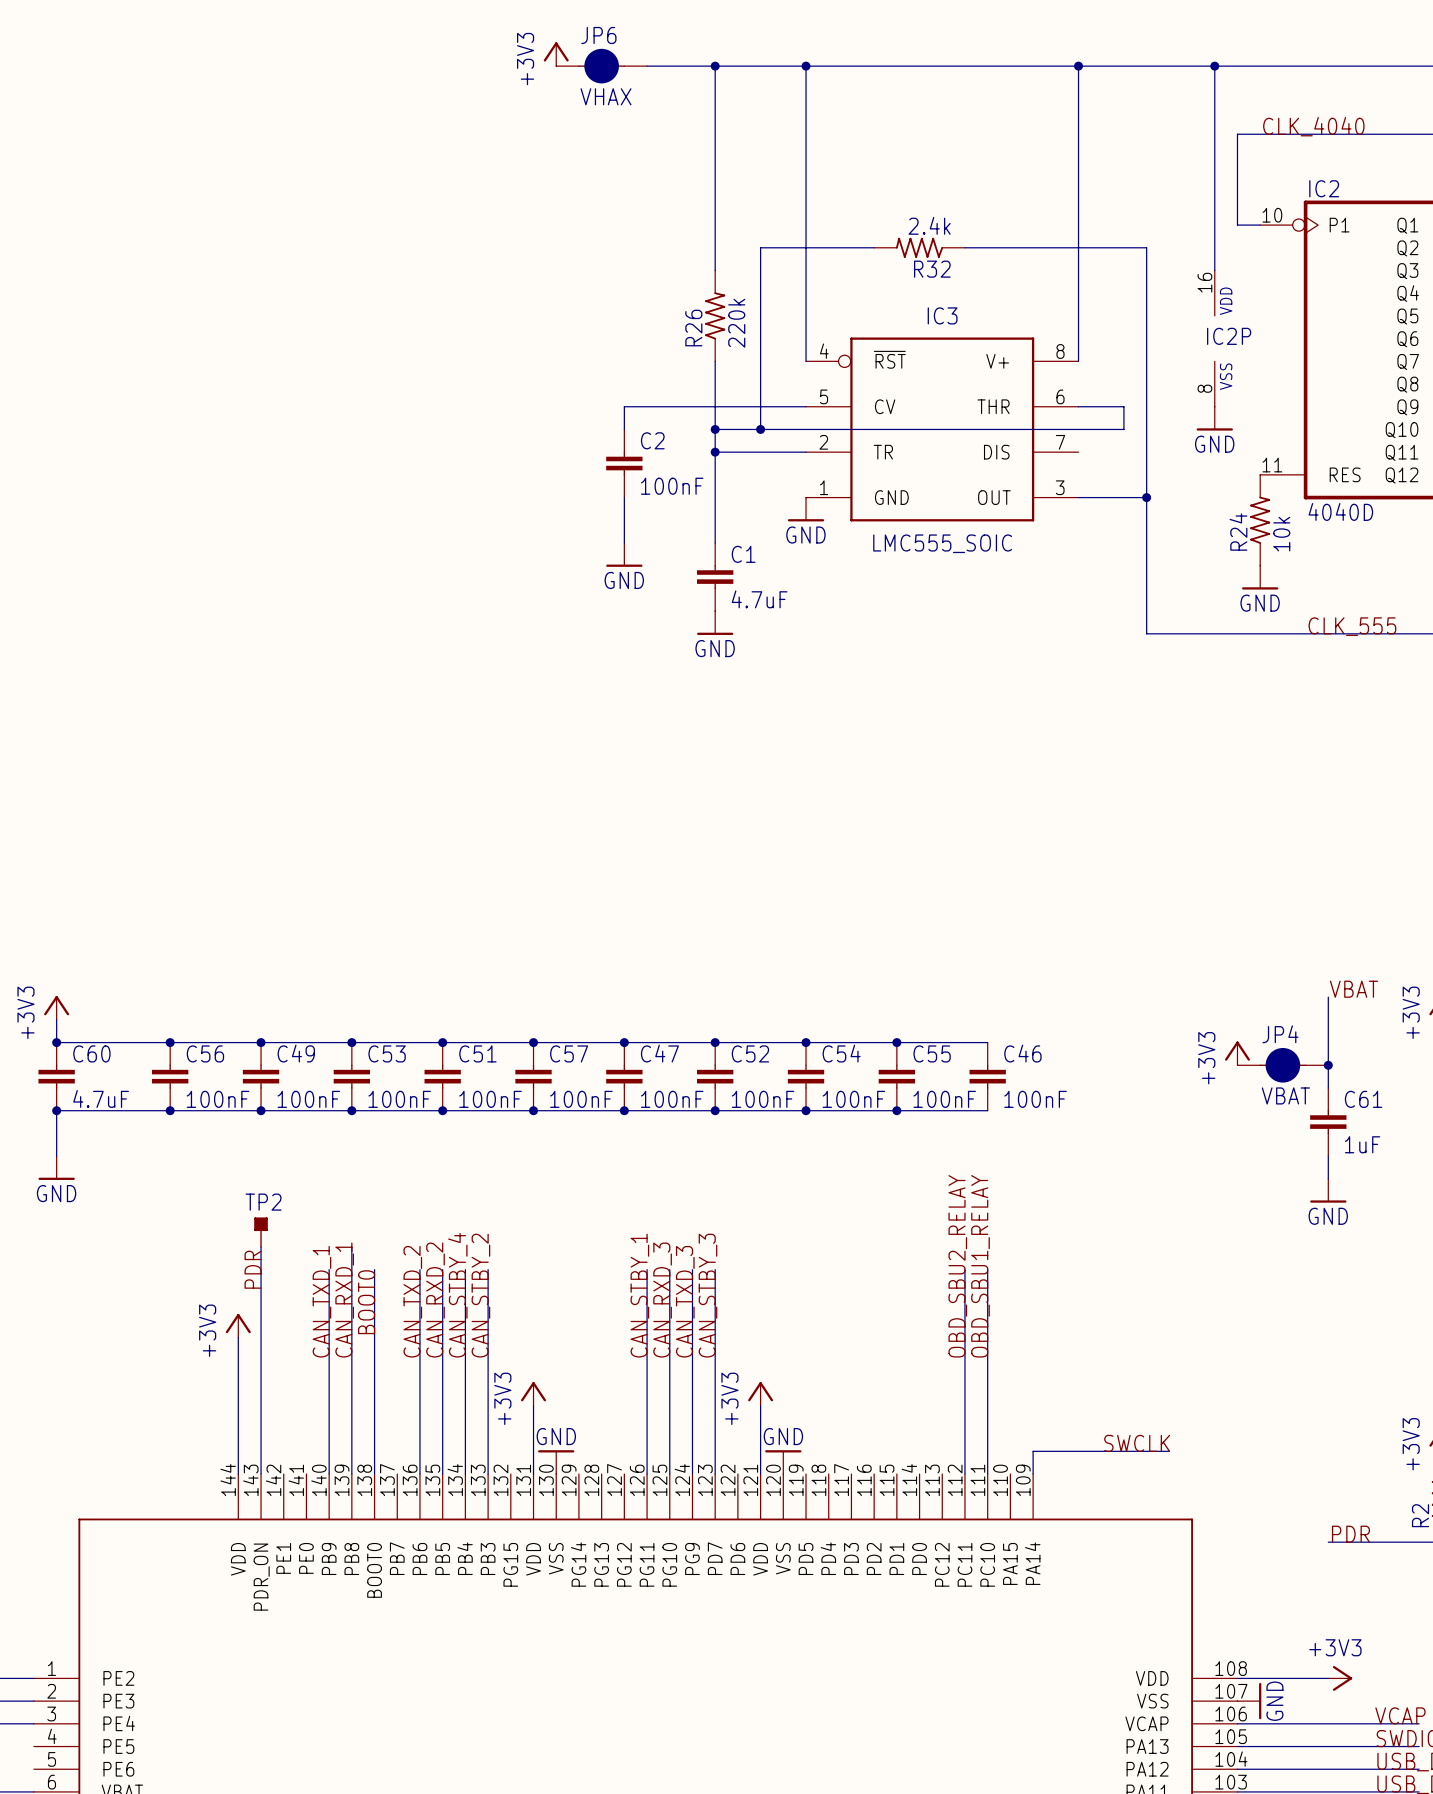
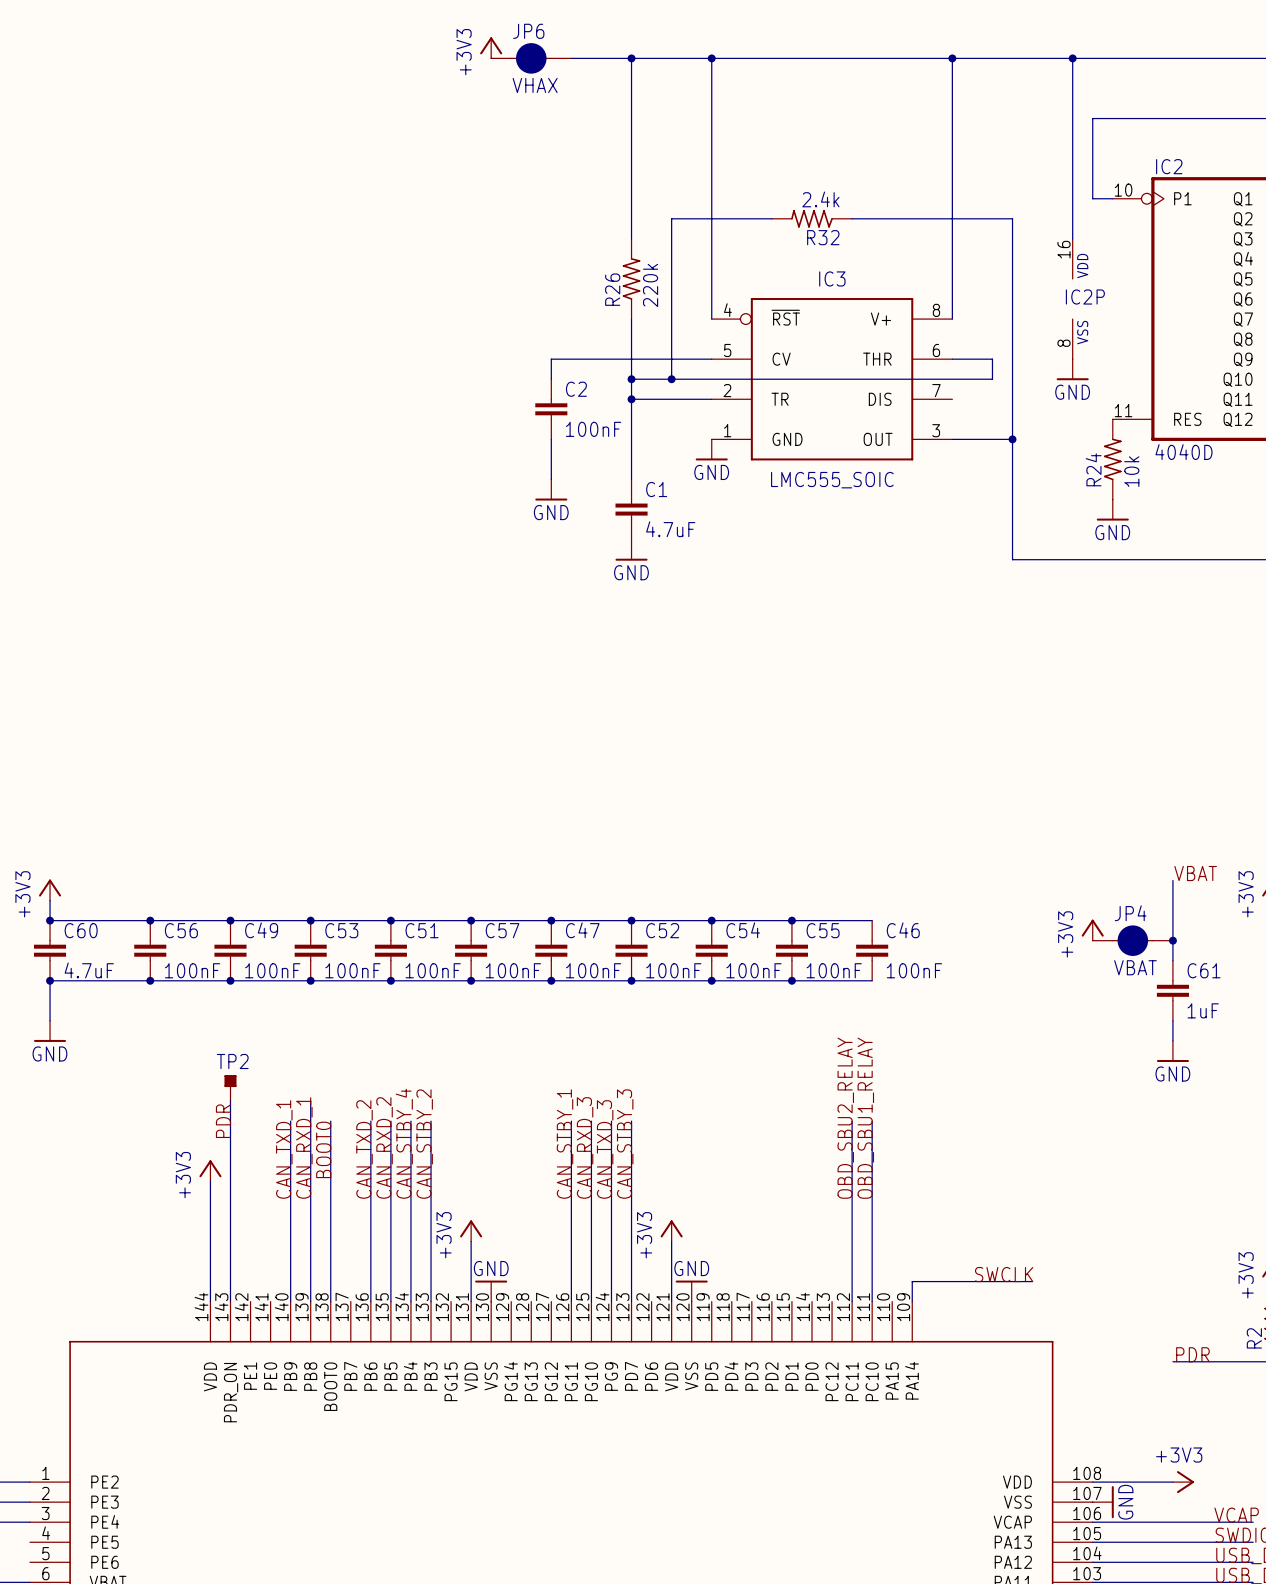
label: CLK_4040 (1313, 126) -> none
label: CLK_555 (1352, 626) -> none

